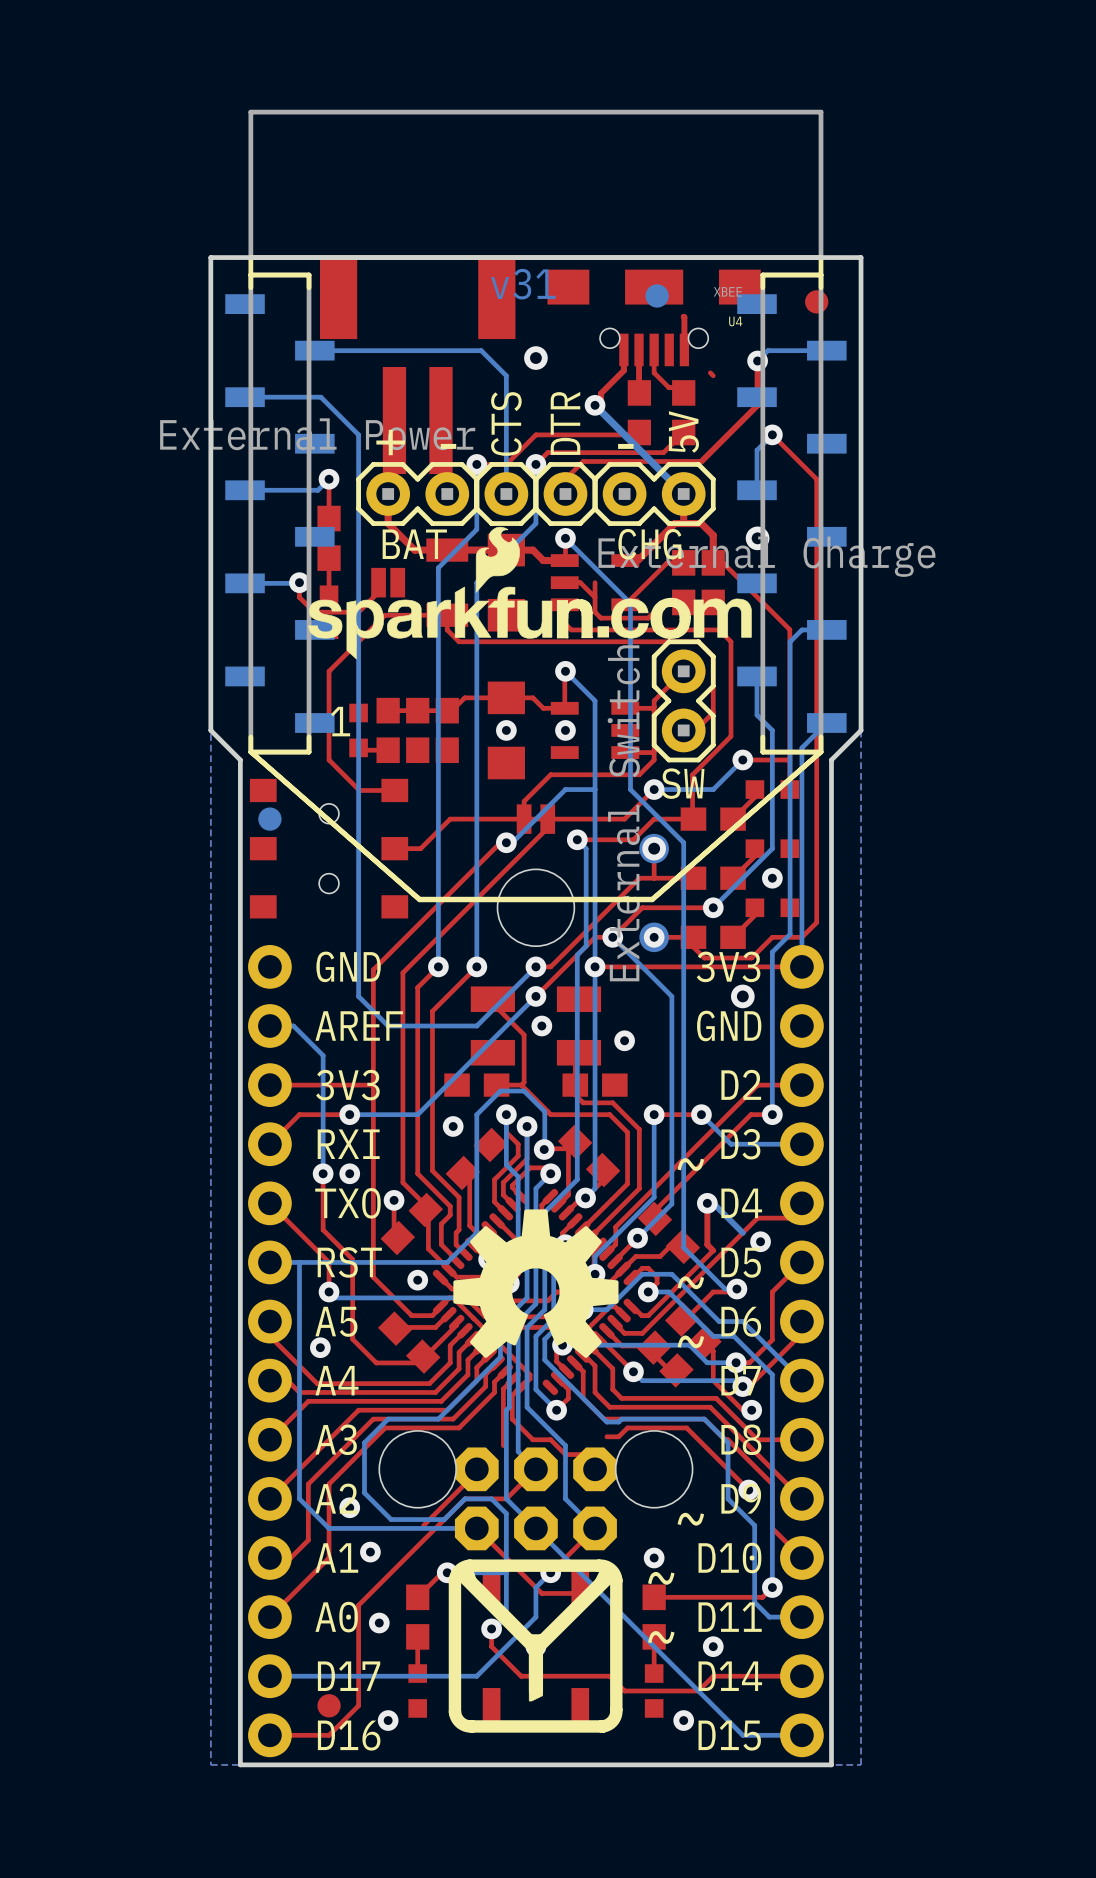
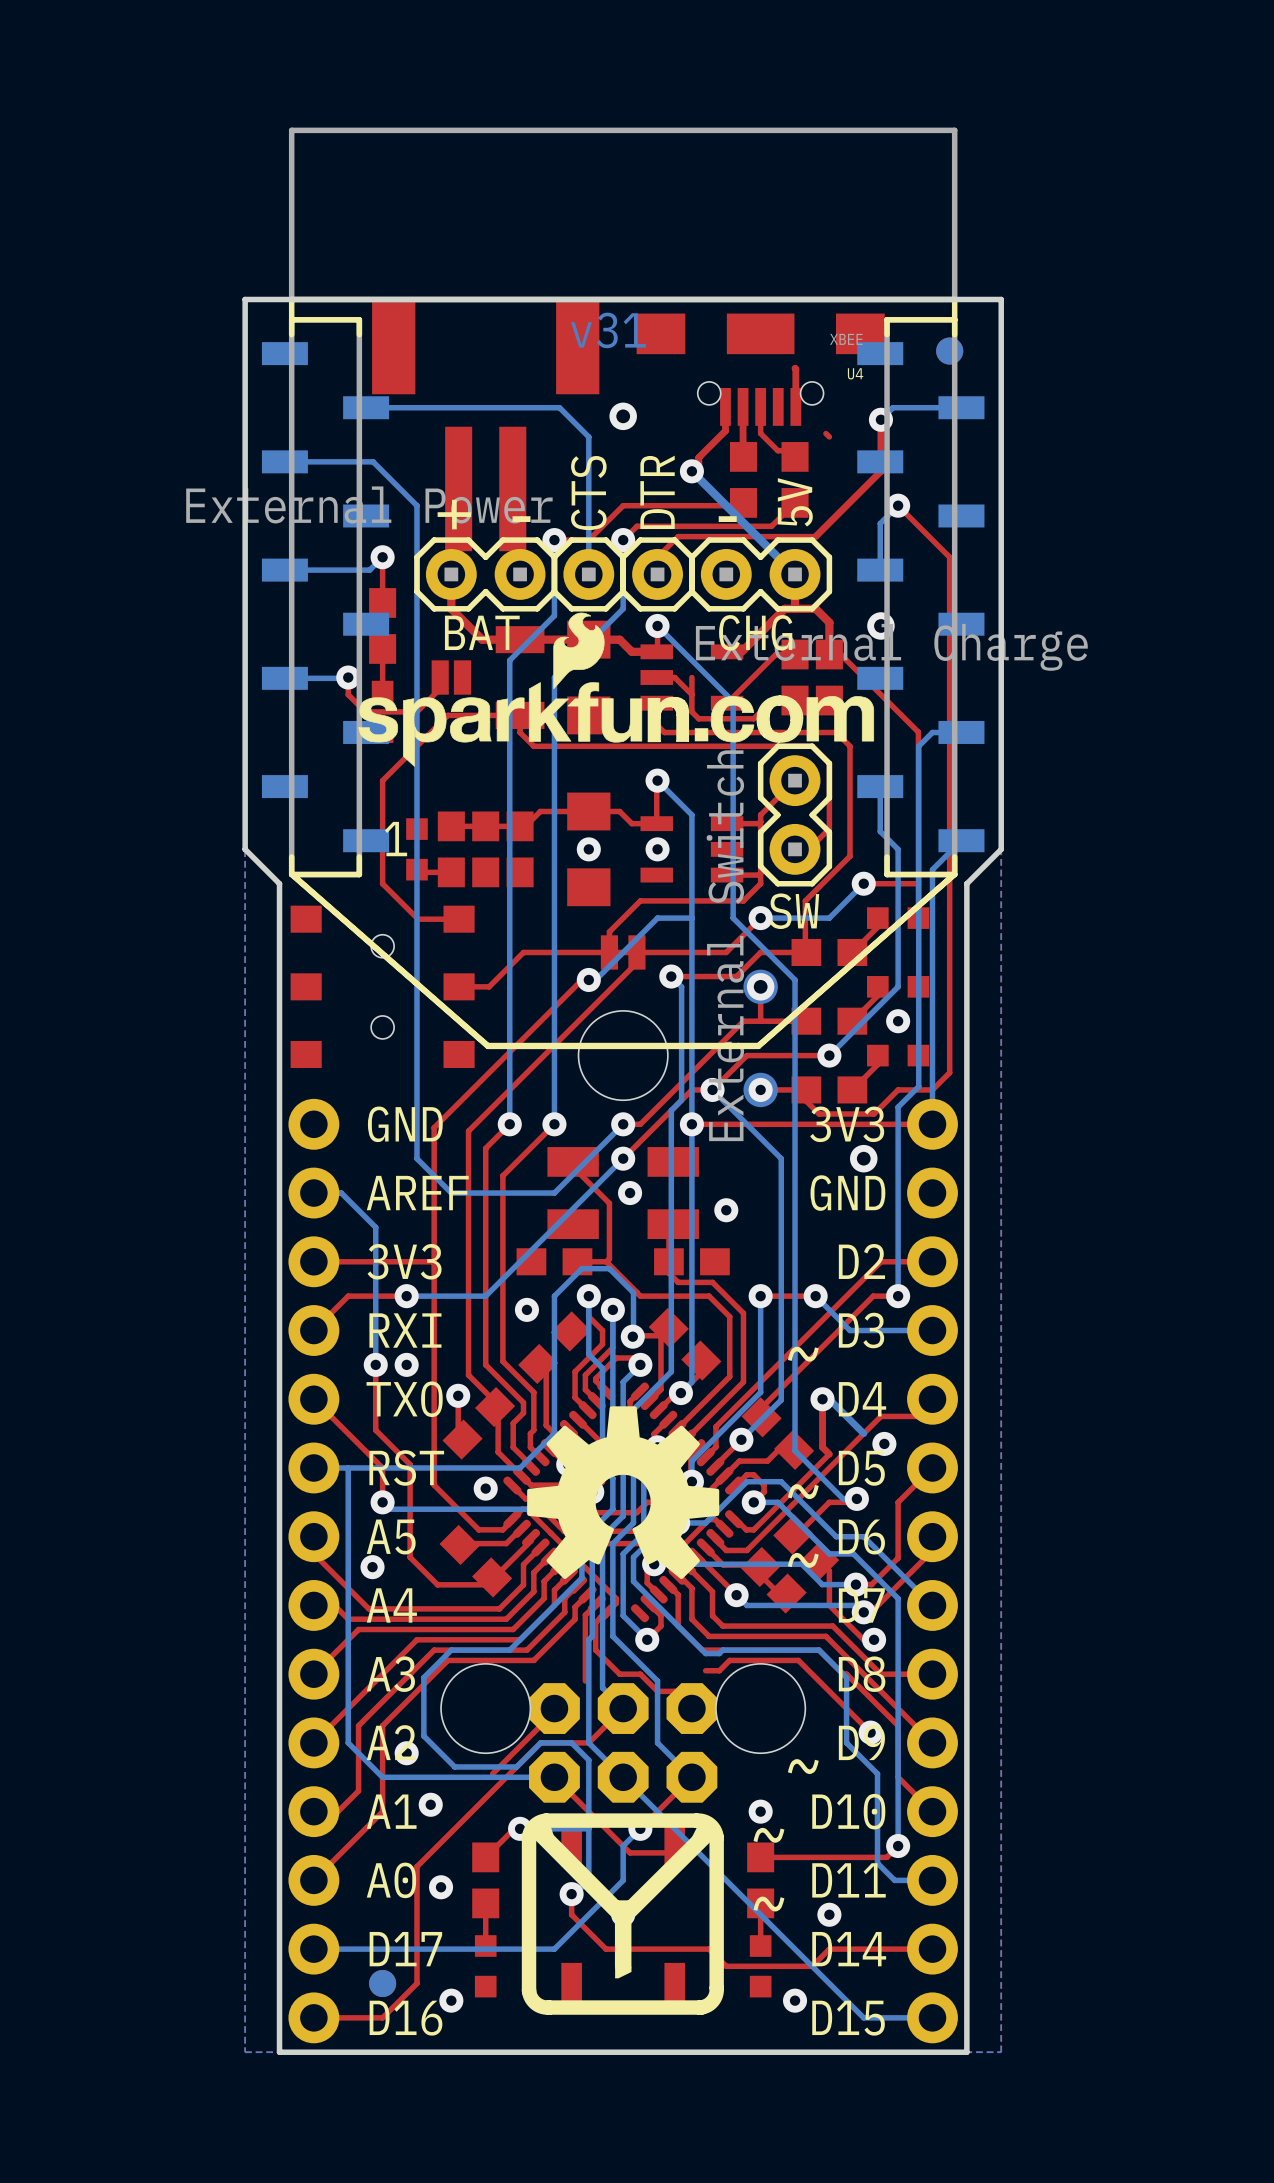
part position: (657, 295) -> (949, 351)
part: (269, 819) -> none
part: none -> (382, 1983)

